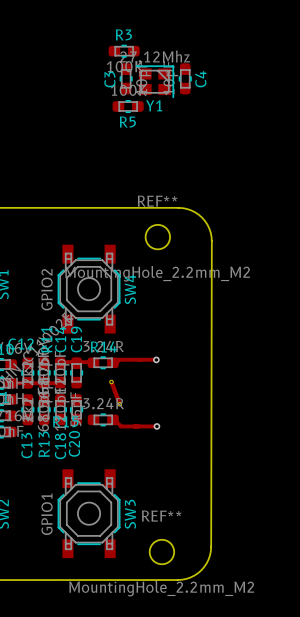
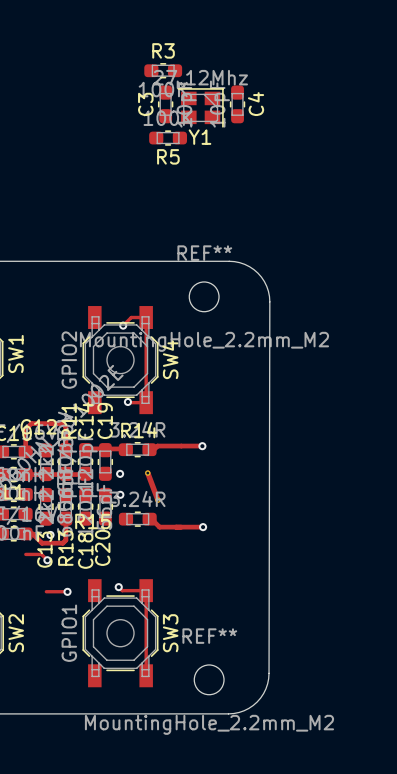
track: none -> (123, 325) (131, 317) (146, 317) (146, 402) (127, 401)
via: none -> (123, 325)
via: none -> (127, 401)
track: none -> (65, 450) (65, 426) (62, 423) (31, 423) (25, 429) (25, 451)
via: none -> (120, 473)
via: none -> (120, 494)
track: none -> (65, 518) (65, 540) (62, 543) (41, 543) (32, 533) (25, 533)
via: none -> (50, 534)
track: none -> (25, 554) (41, 554) (47, 560)
via: none -> (47, 560)
track: none -> (118, 587) (122, 590) (146, 590) (146, 675)
via: none -> (118, 587)
track: none -> (46, 591) (67, 591)
via: none -> (67, 591)

